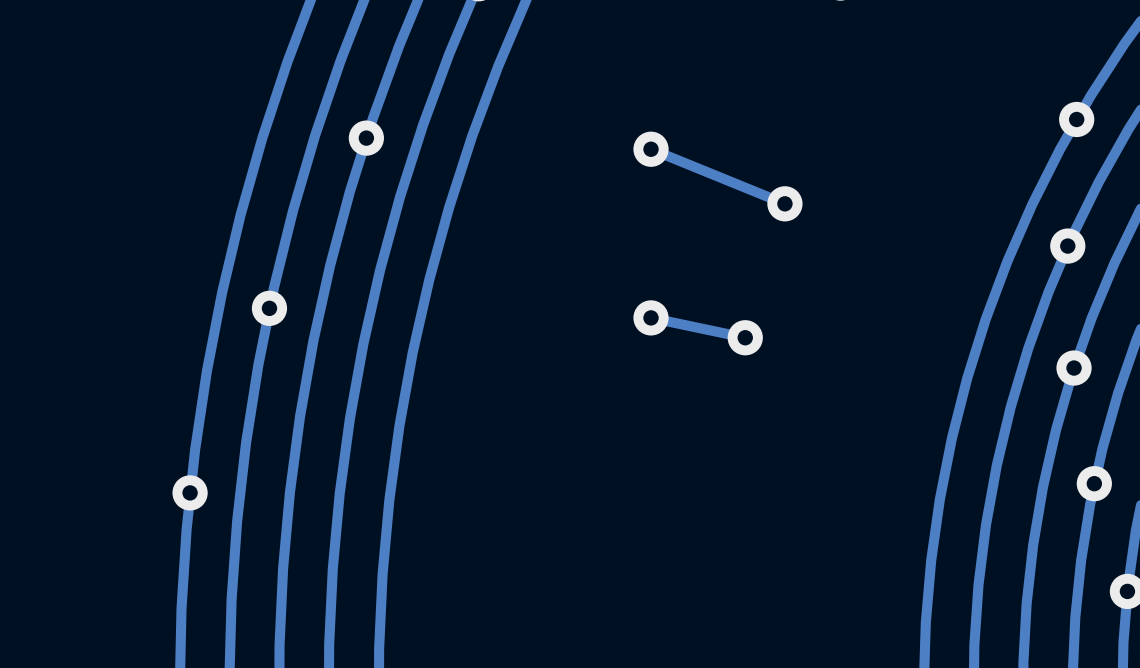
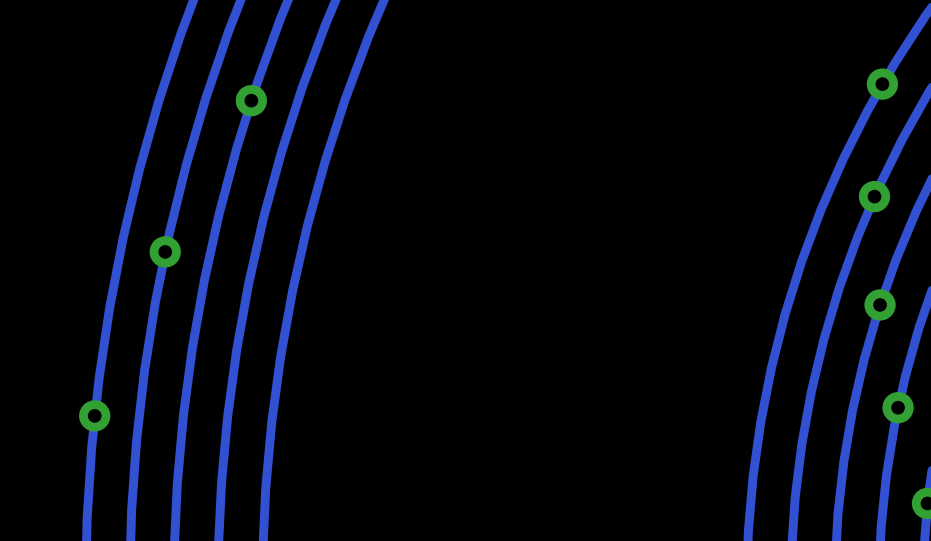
track: (651, 149) (784, 203) -> none
via: (651, 149) -> none
via: (784, 203) -> none
track: (651, 317) (745, 337) -> none
via: (651, 317) -> none
via: (745, 337) -> none

